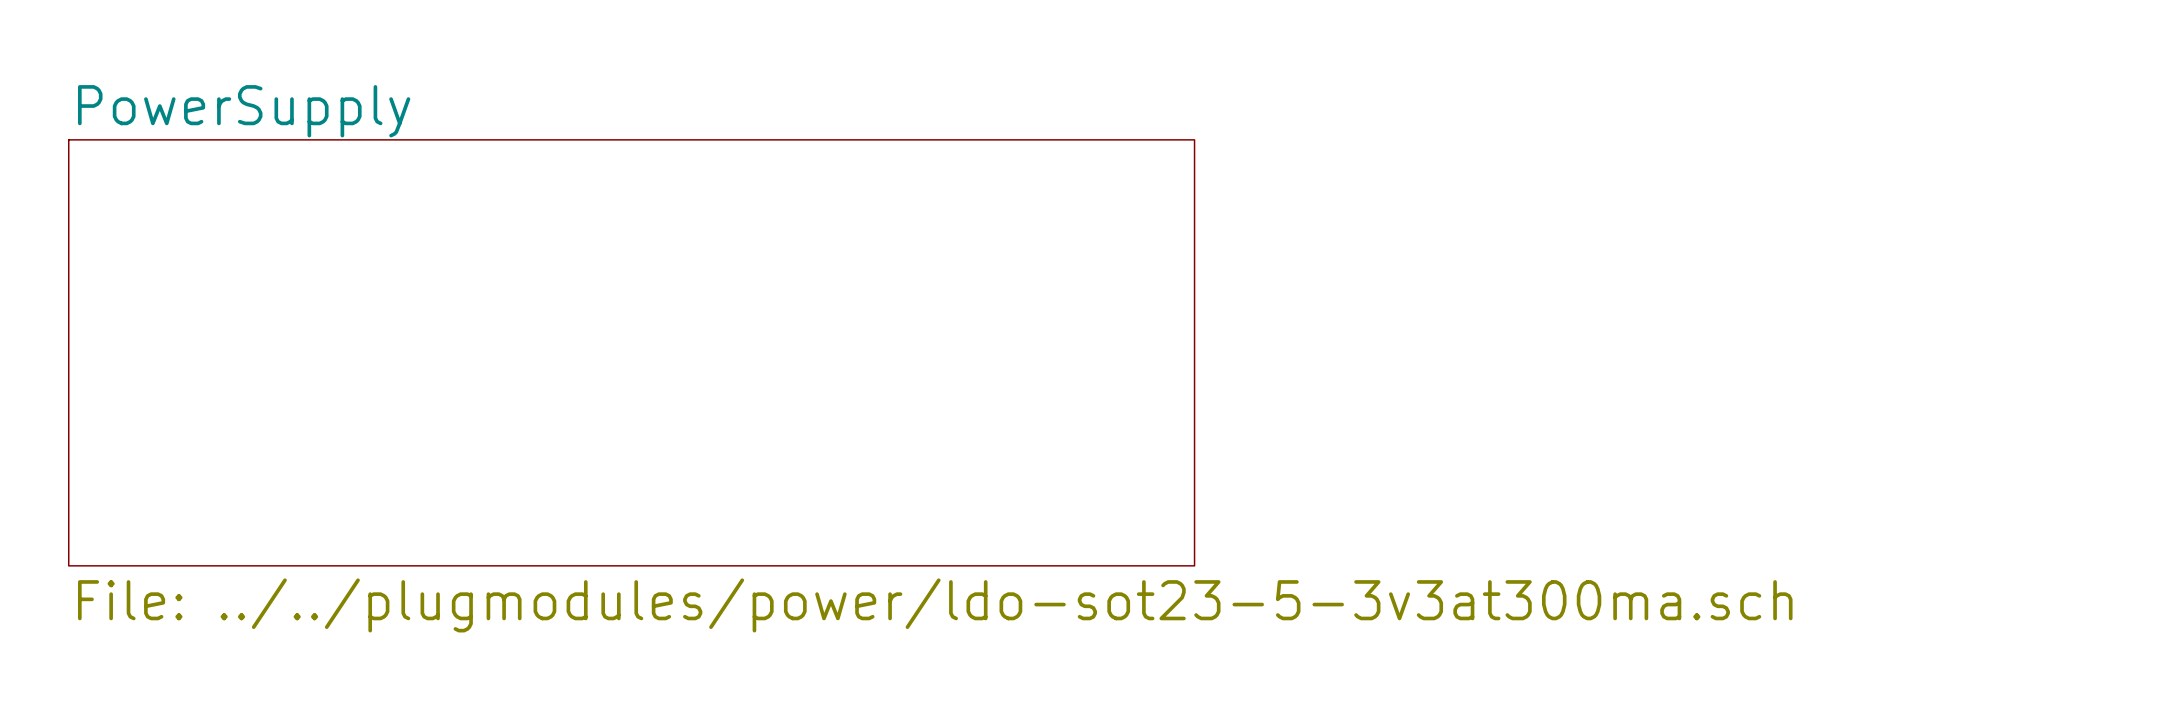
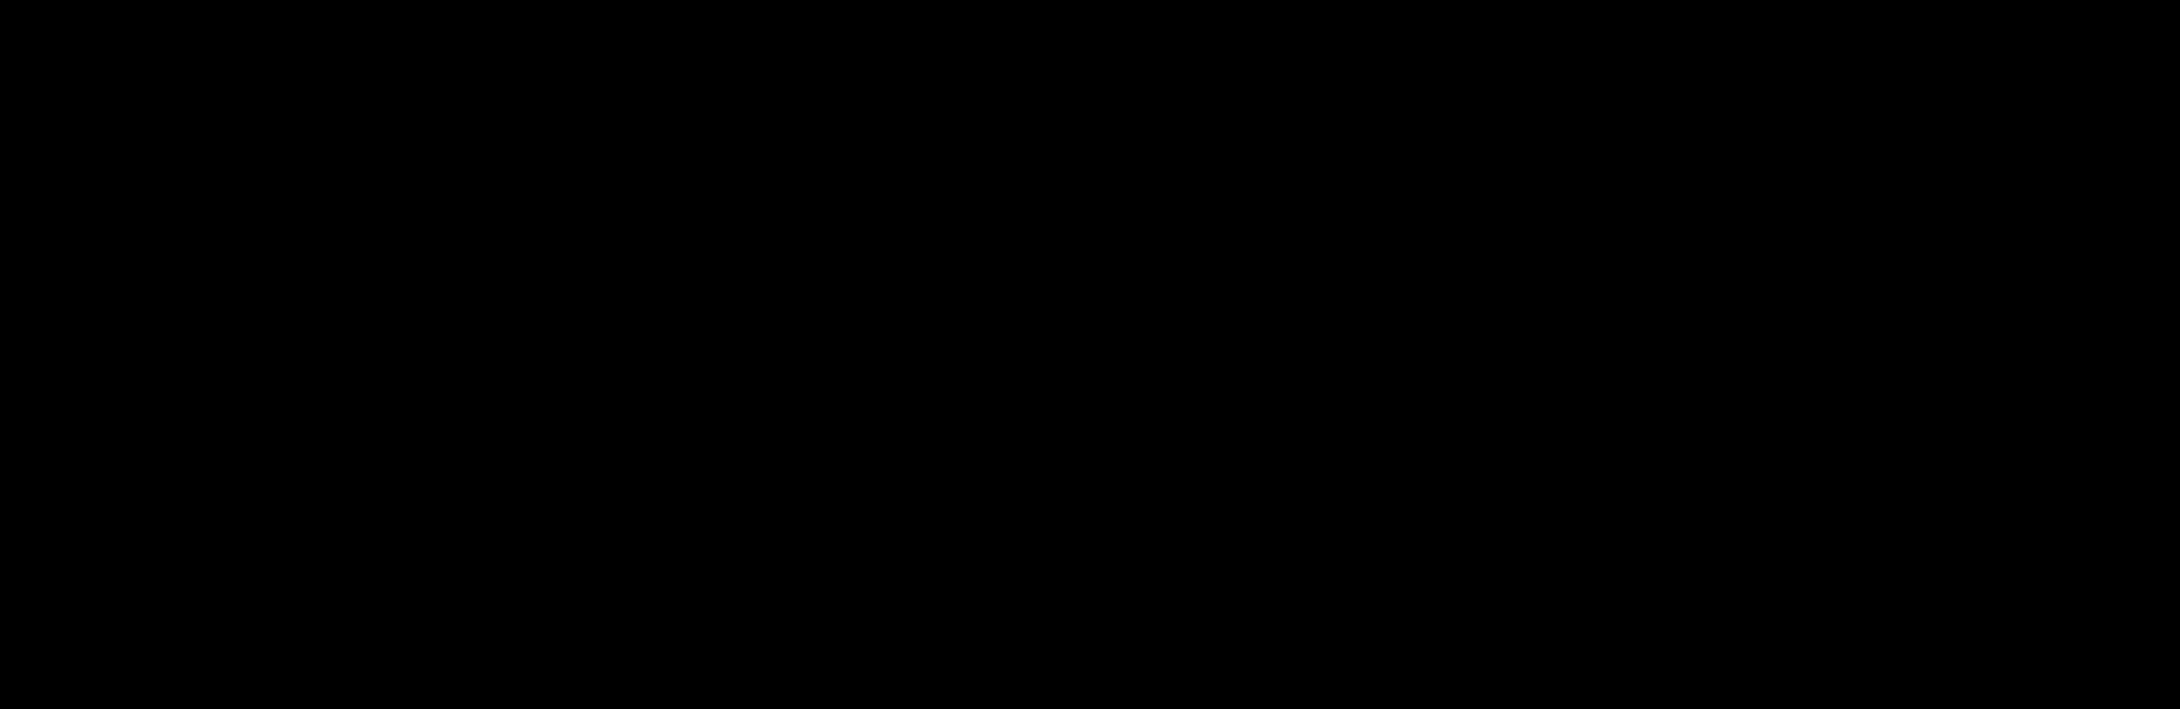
sheet PowerSupply: File: ../../plugmodules/power/ldo-sot23-5-3v3at300ma.sch (631, 352) -> none

